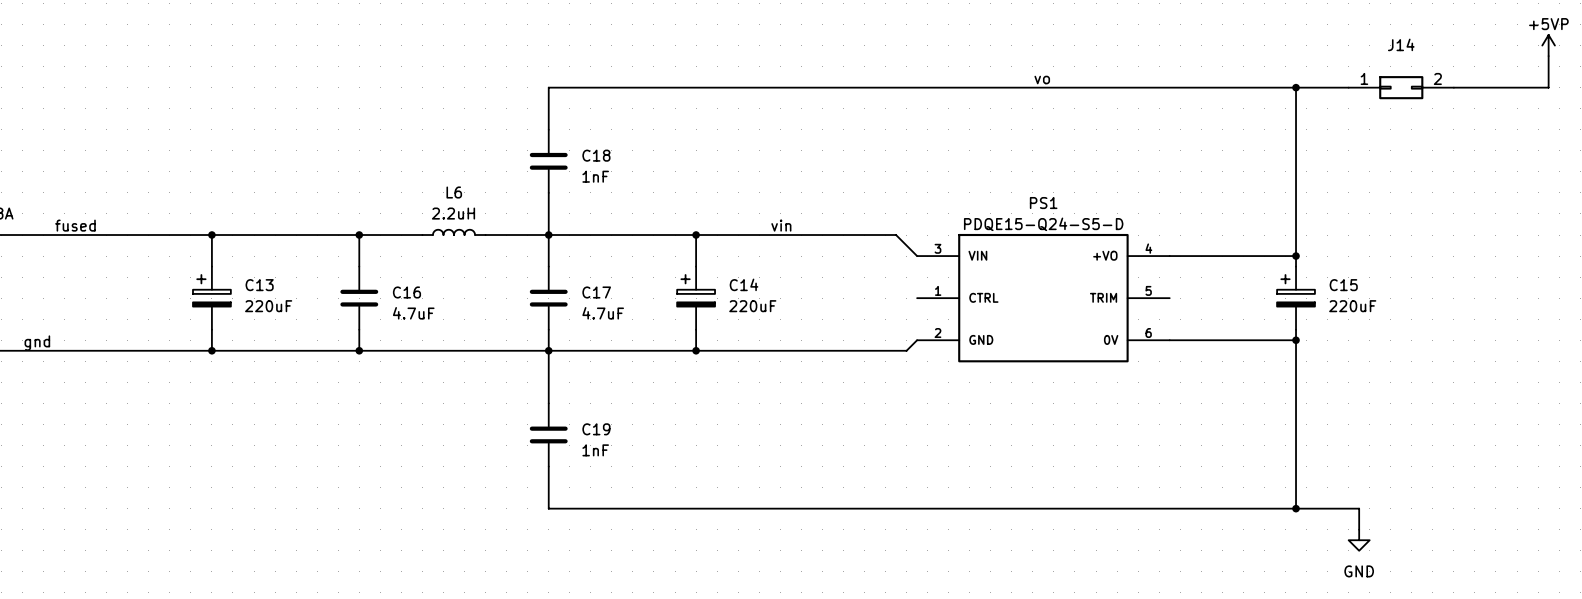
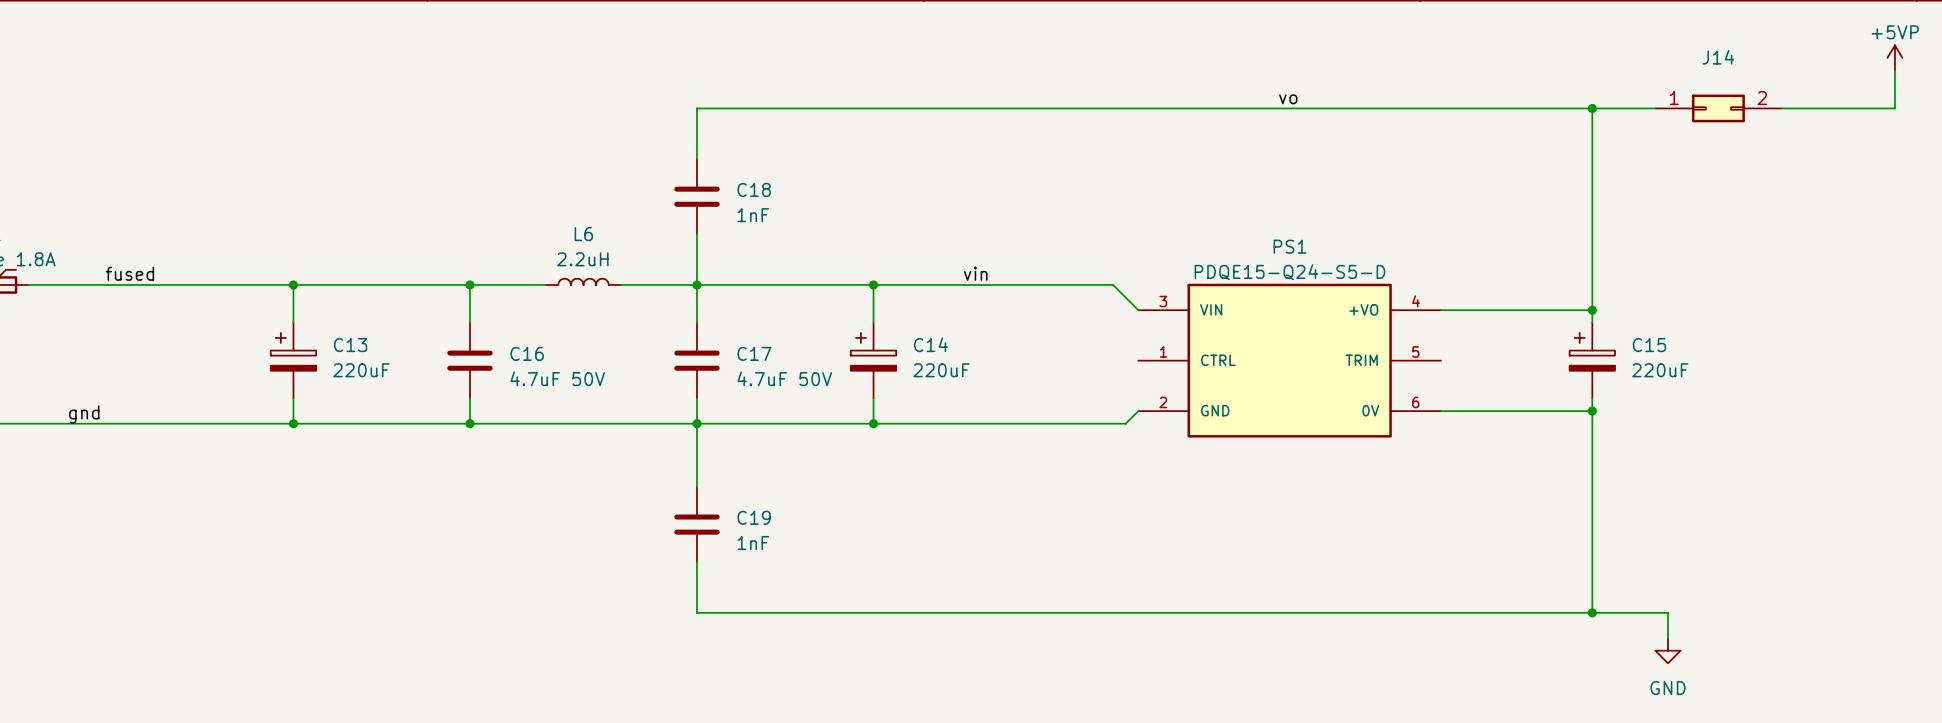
C16 value: 4.7uF (413, 313) -> 4.7uF 50V (557, 378)
C17 value: 4.7uF (603, 313) -> 4.7uF 50V (784, 378)

